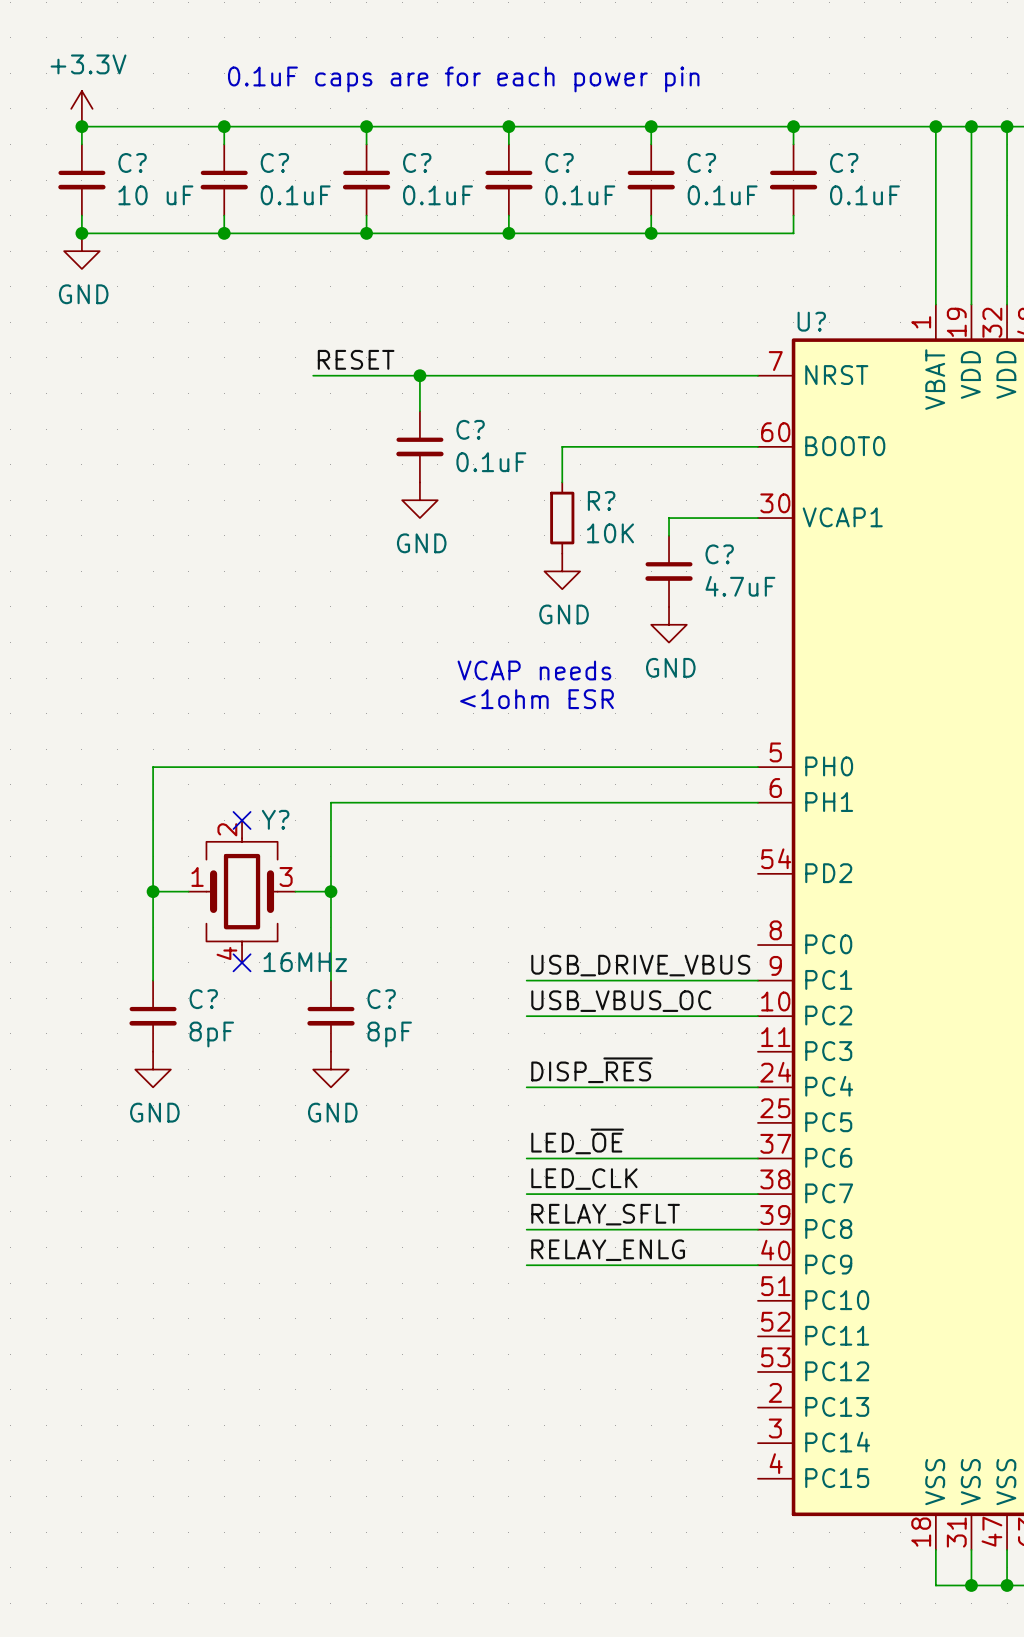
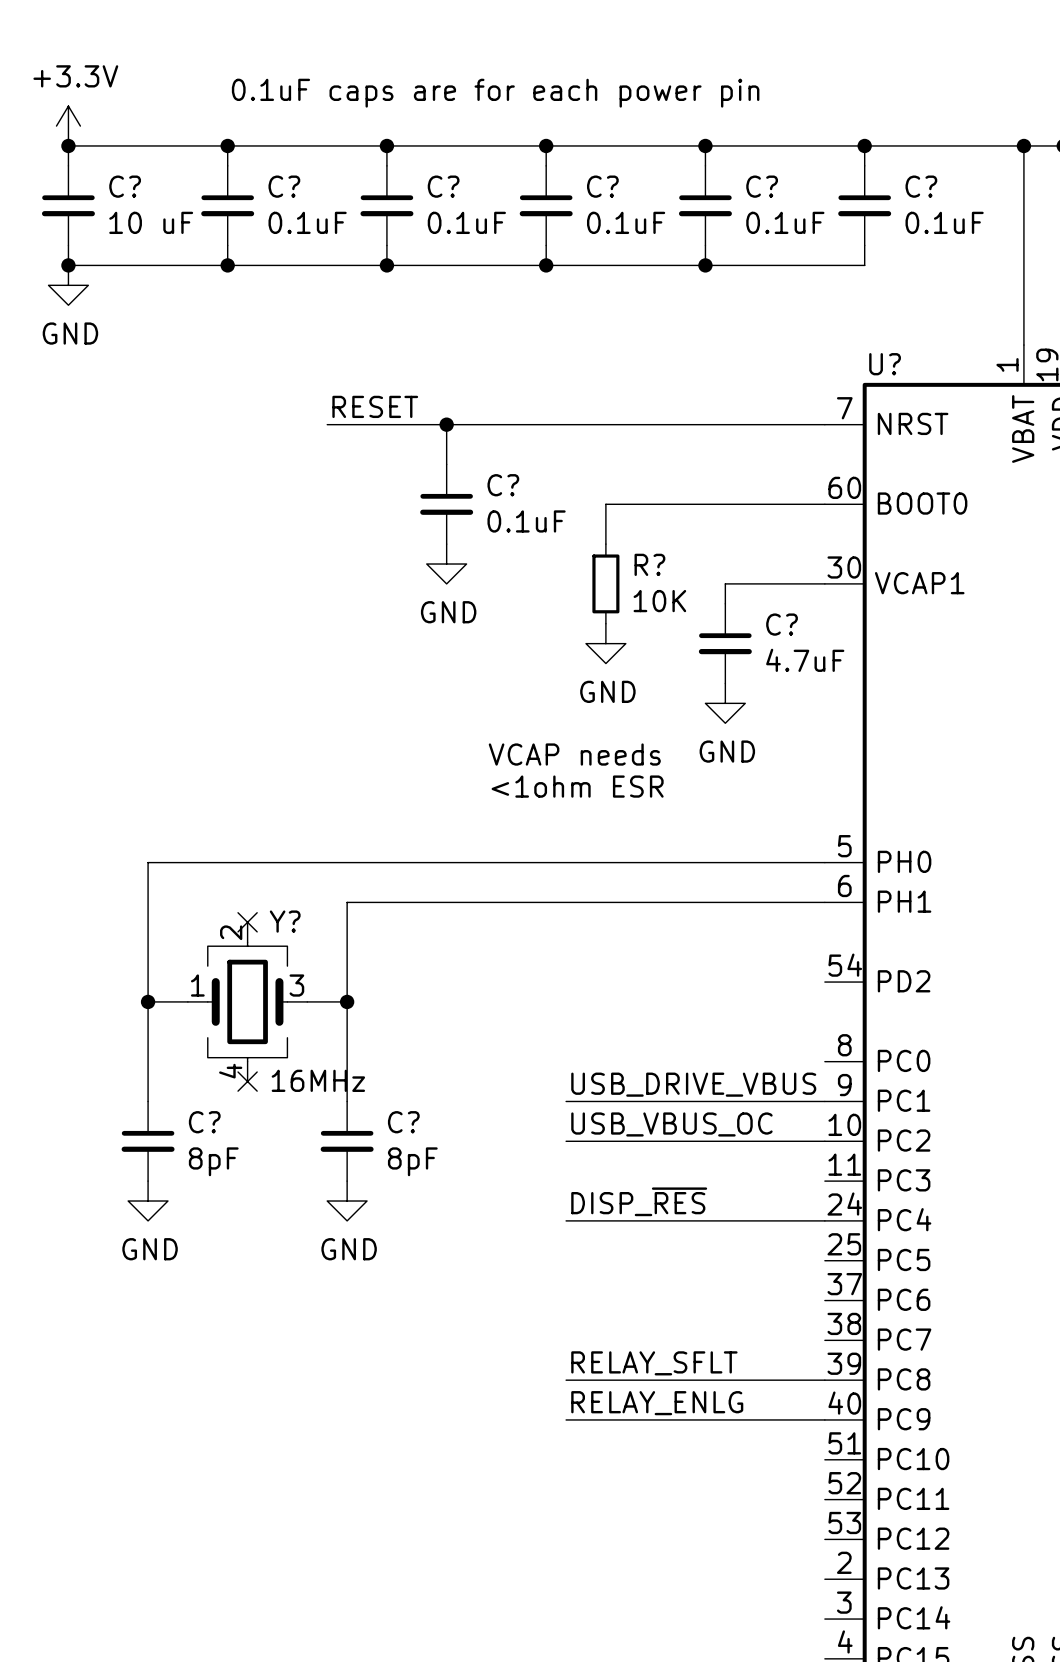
label: LED_~{OE} (577, 1141) -> none
wire: (526, 1158) (757, 1158) -> none
label: LED_CLK (584, 1179) -> none
wire: (526, 1194) (757, 1194) -> none

